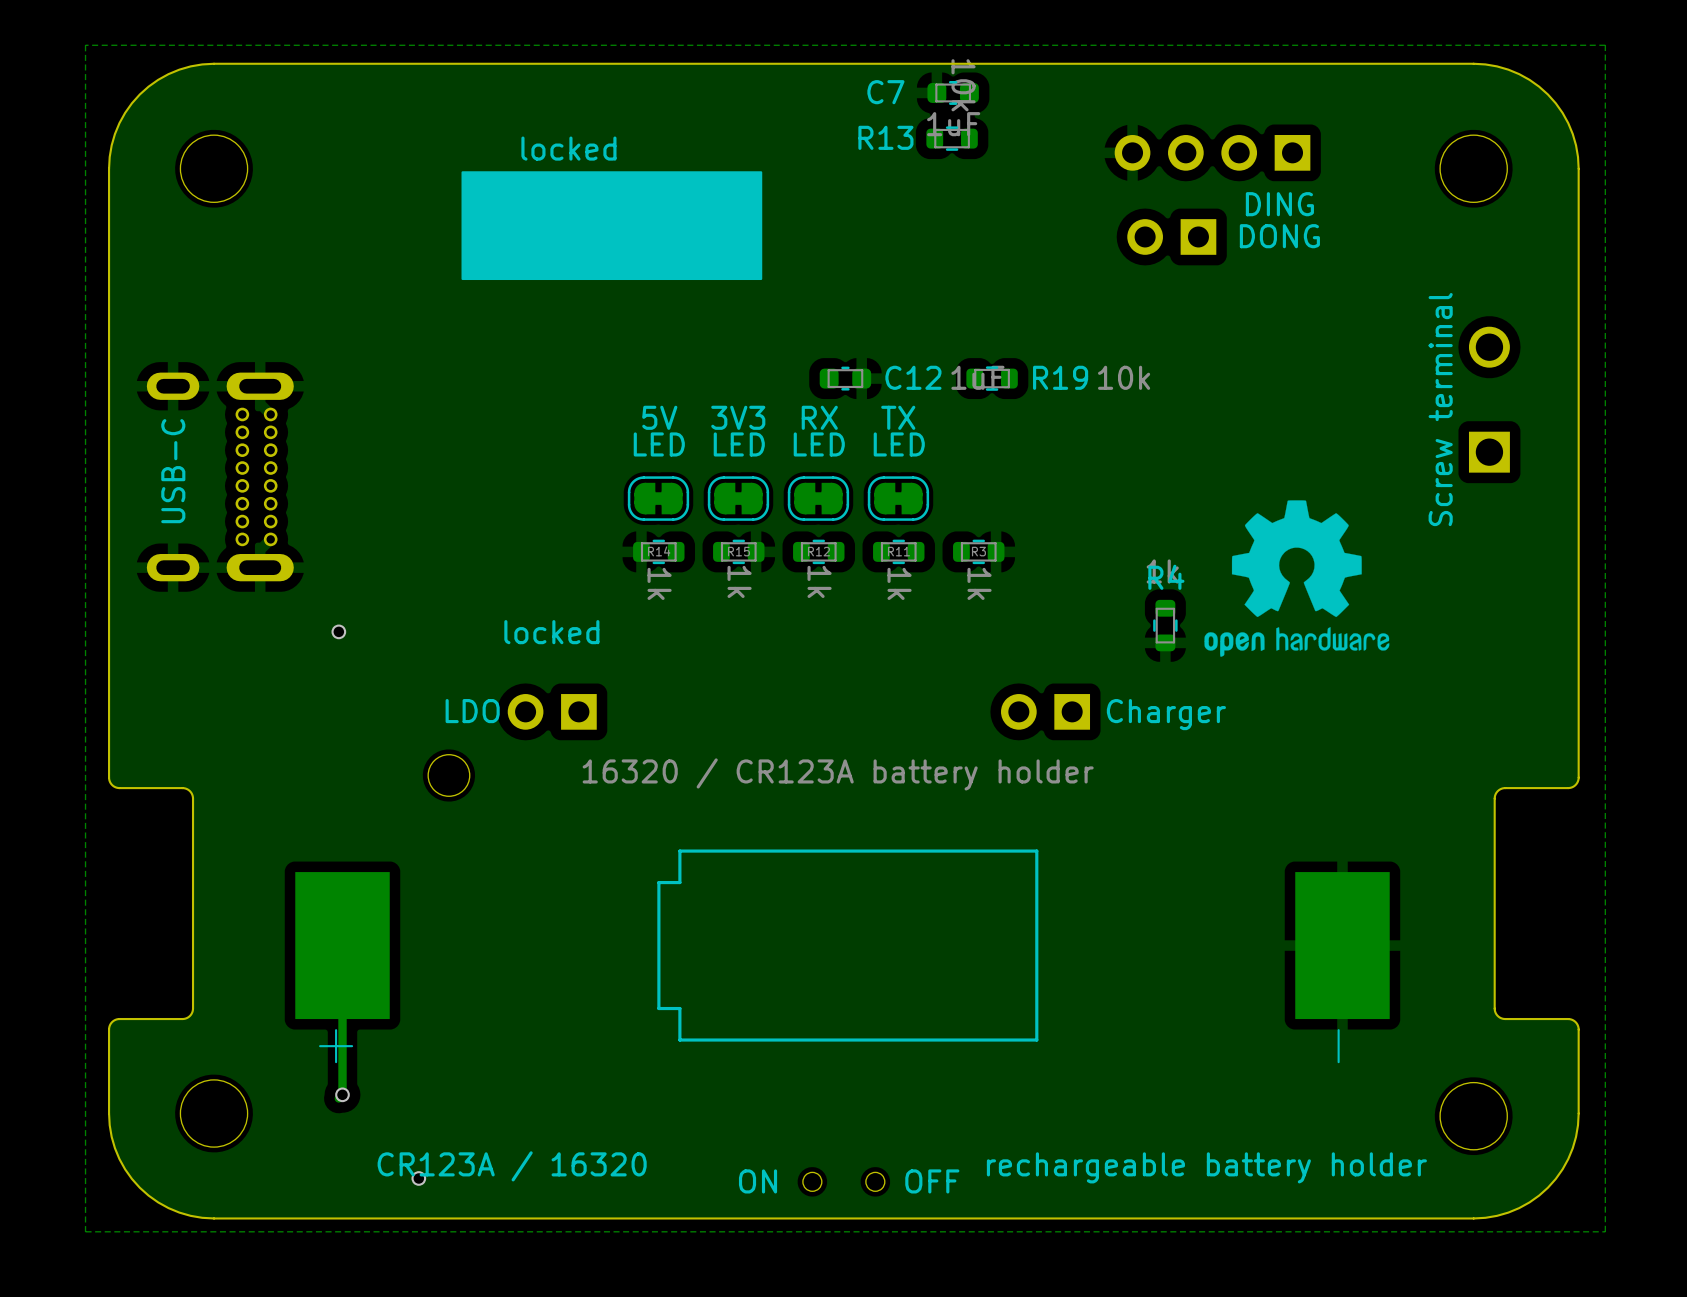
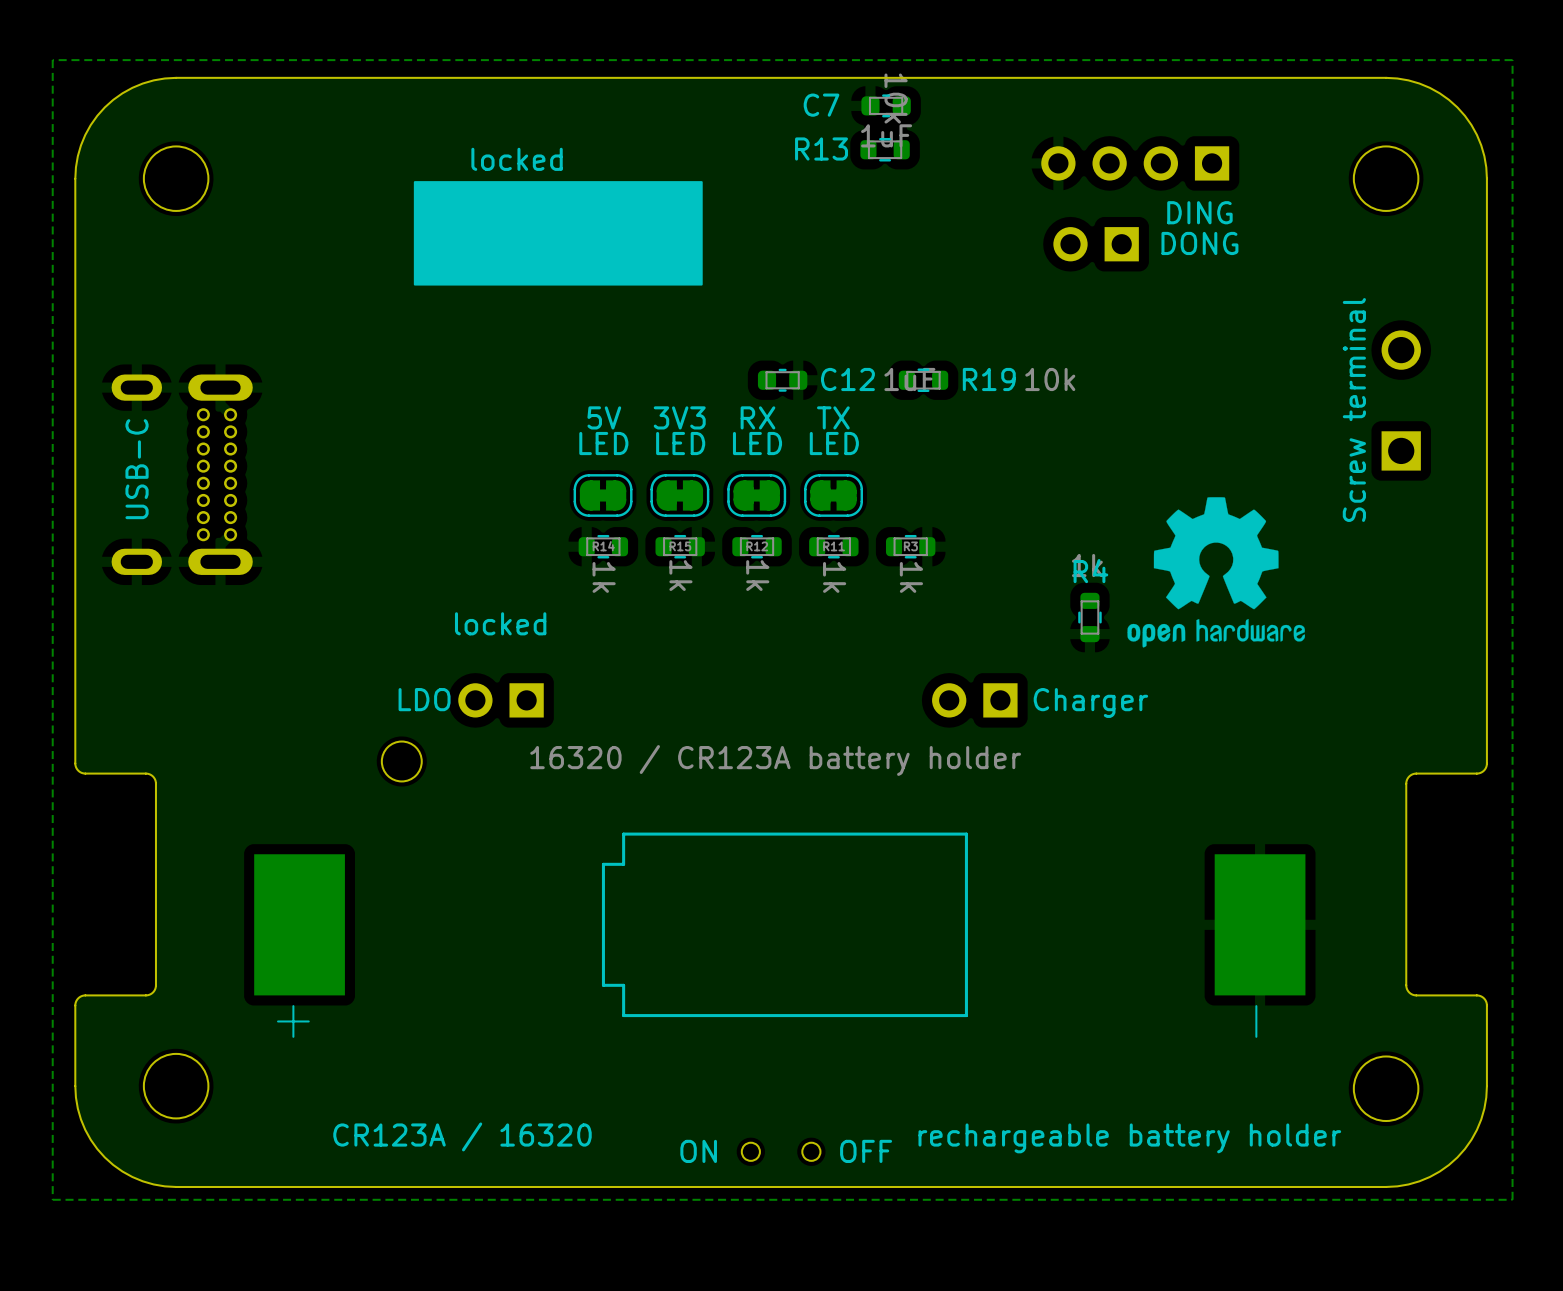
via: (338, 631) -> none
track: (342, 945) (342, 1094) (338, 1098) -> none
via: (342, 1094) -> none
via: (418, 1178) -> none

